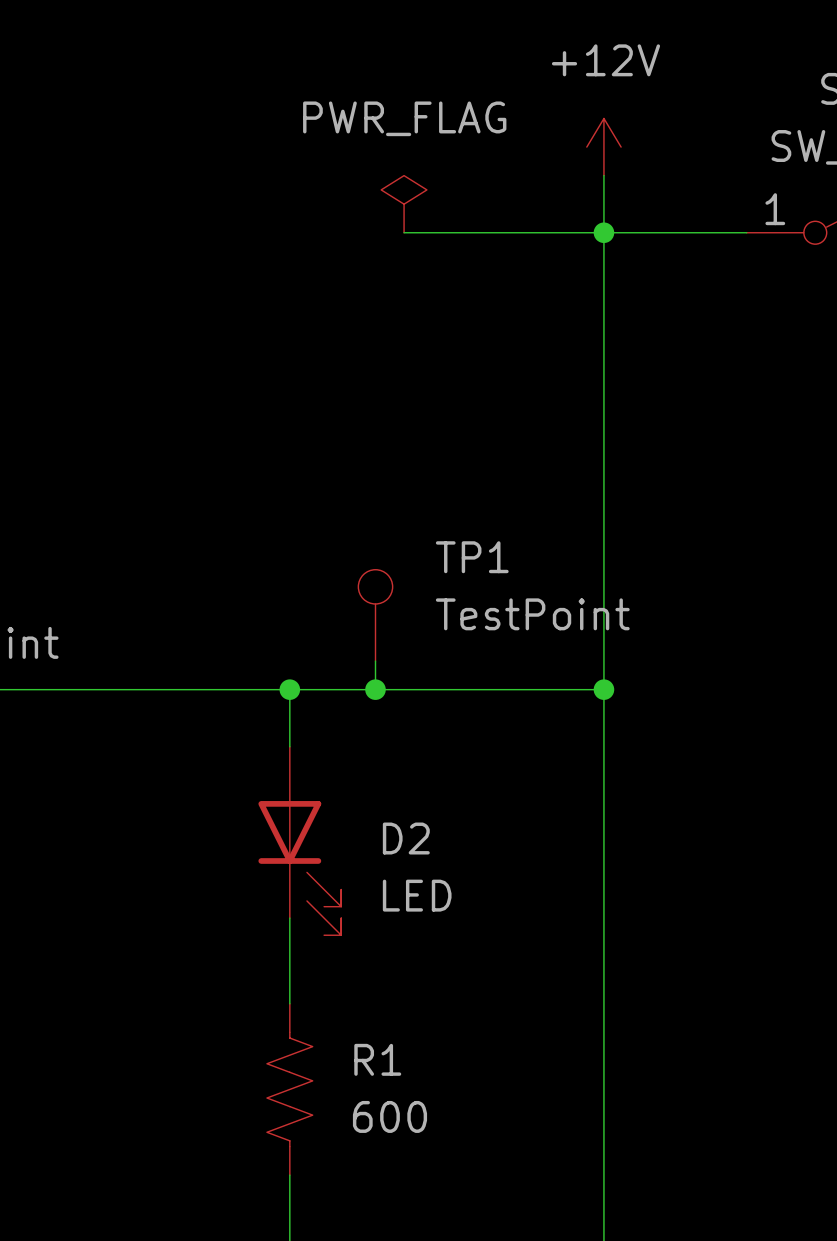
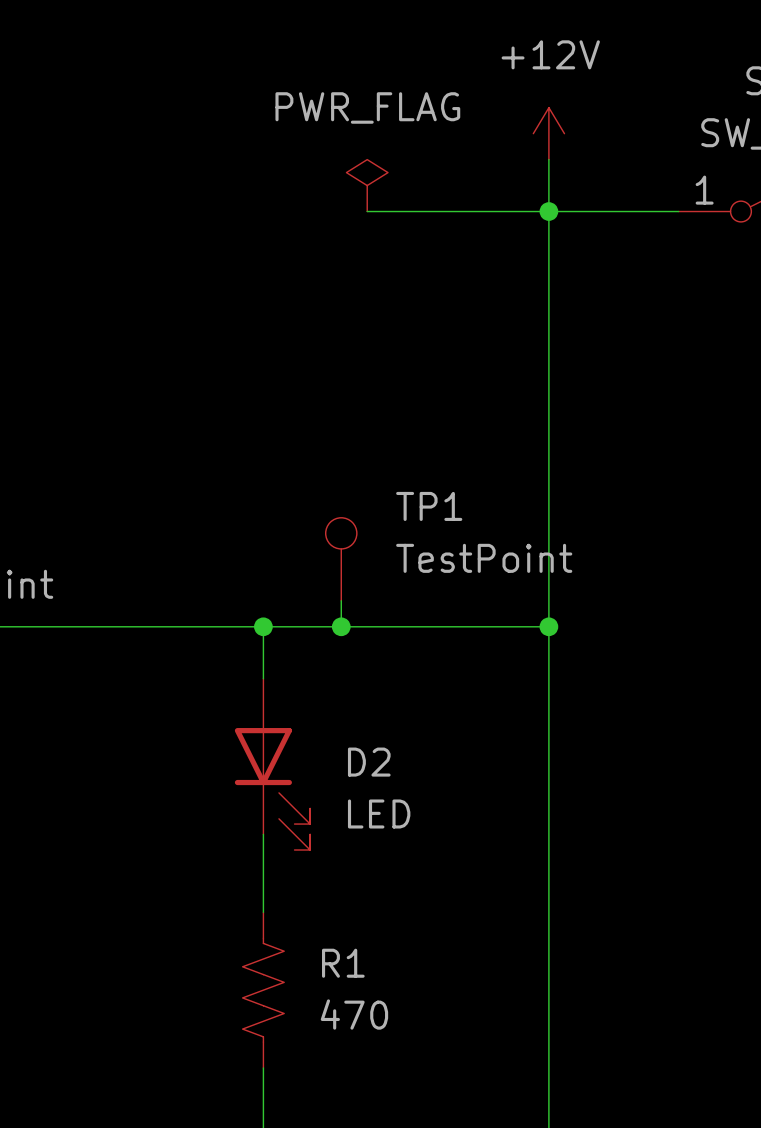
R1 value: 600 (389, 1116) -> 470 (354, 1014)

